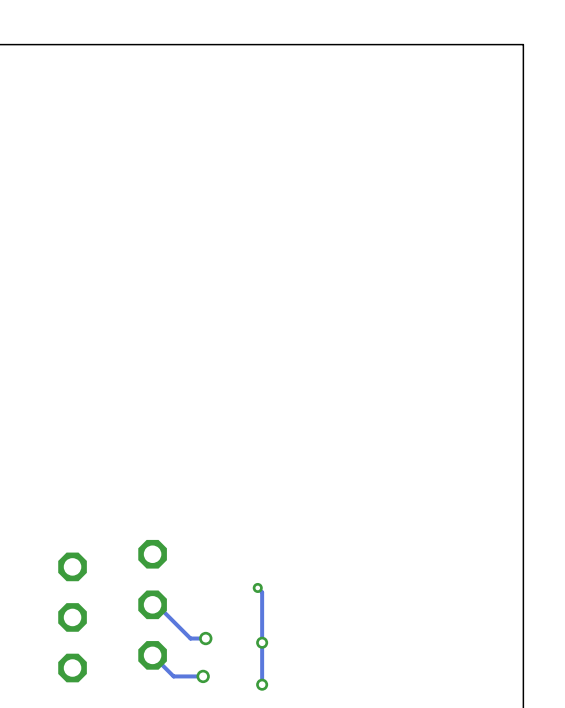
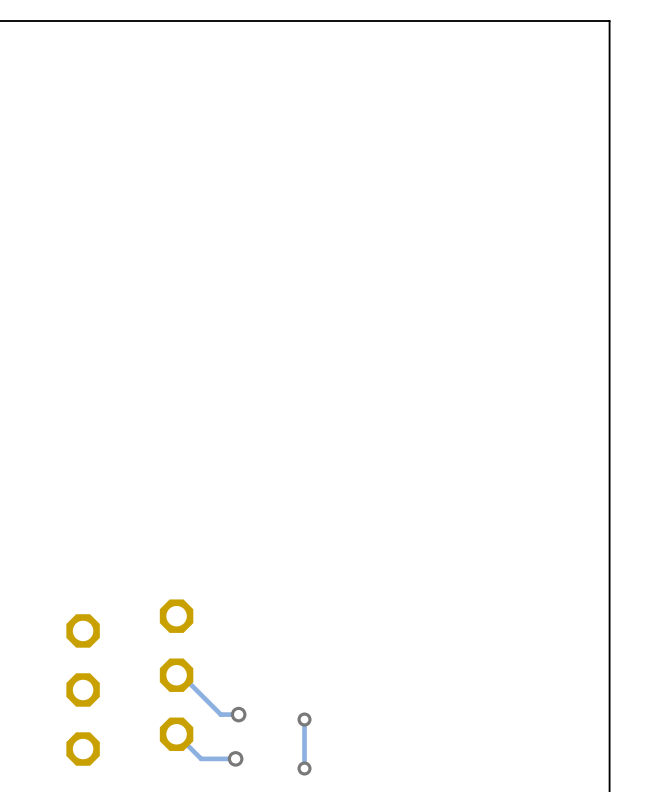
track: (257, 587) (262, 592) (262, 642) -> none
via: (257, 587) -> none

